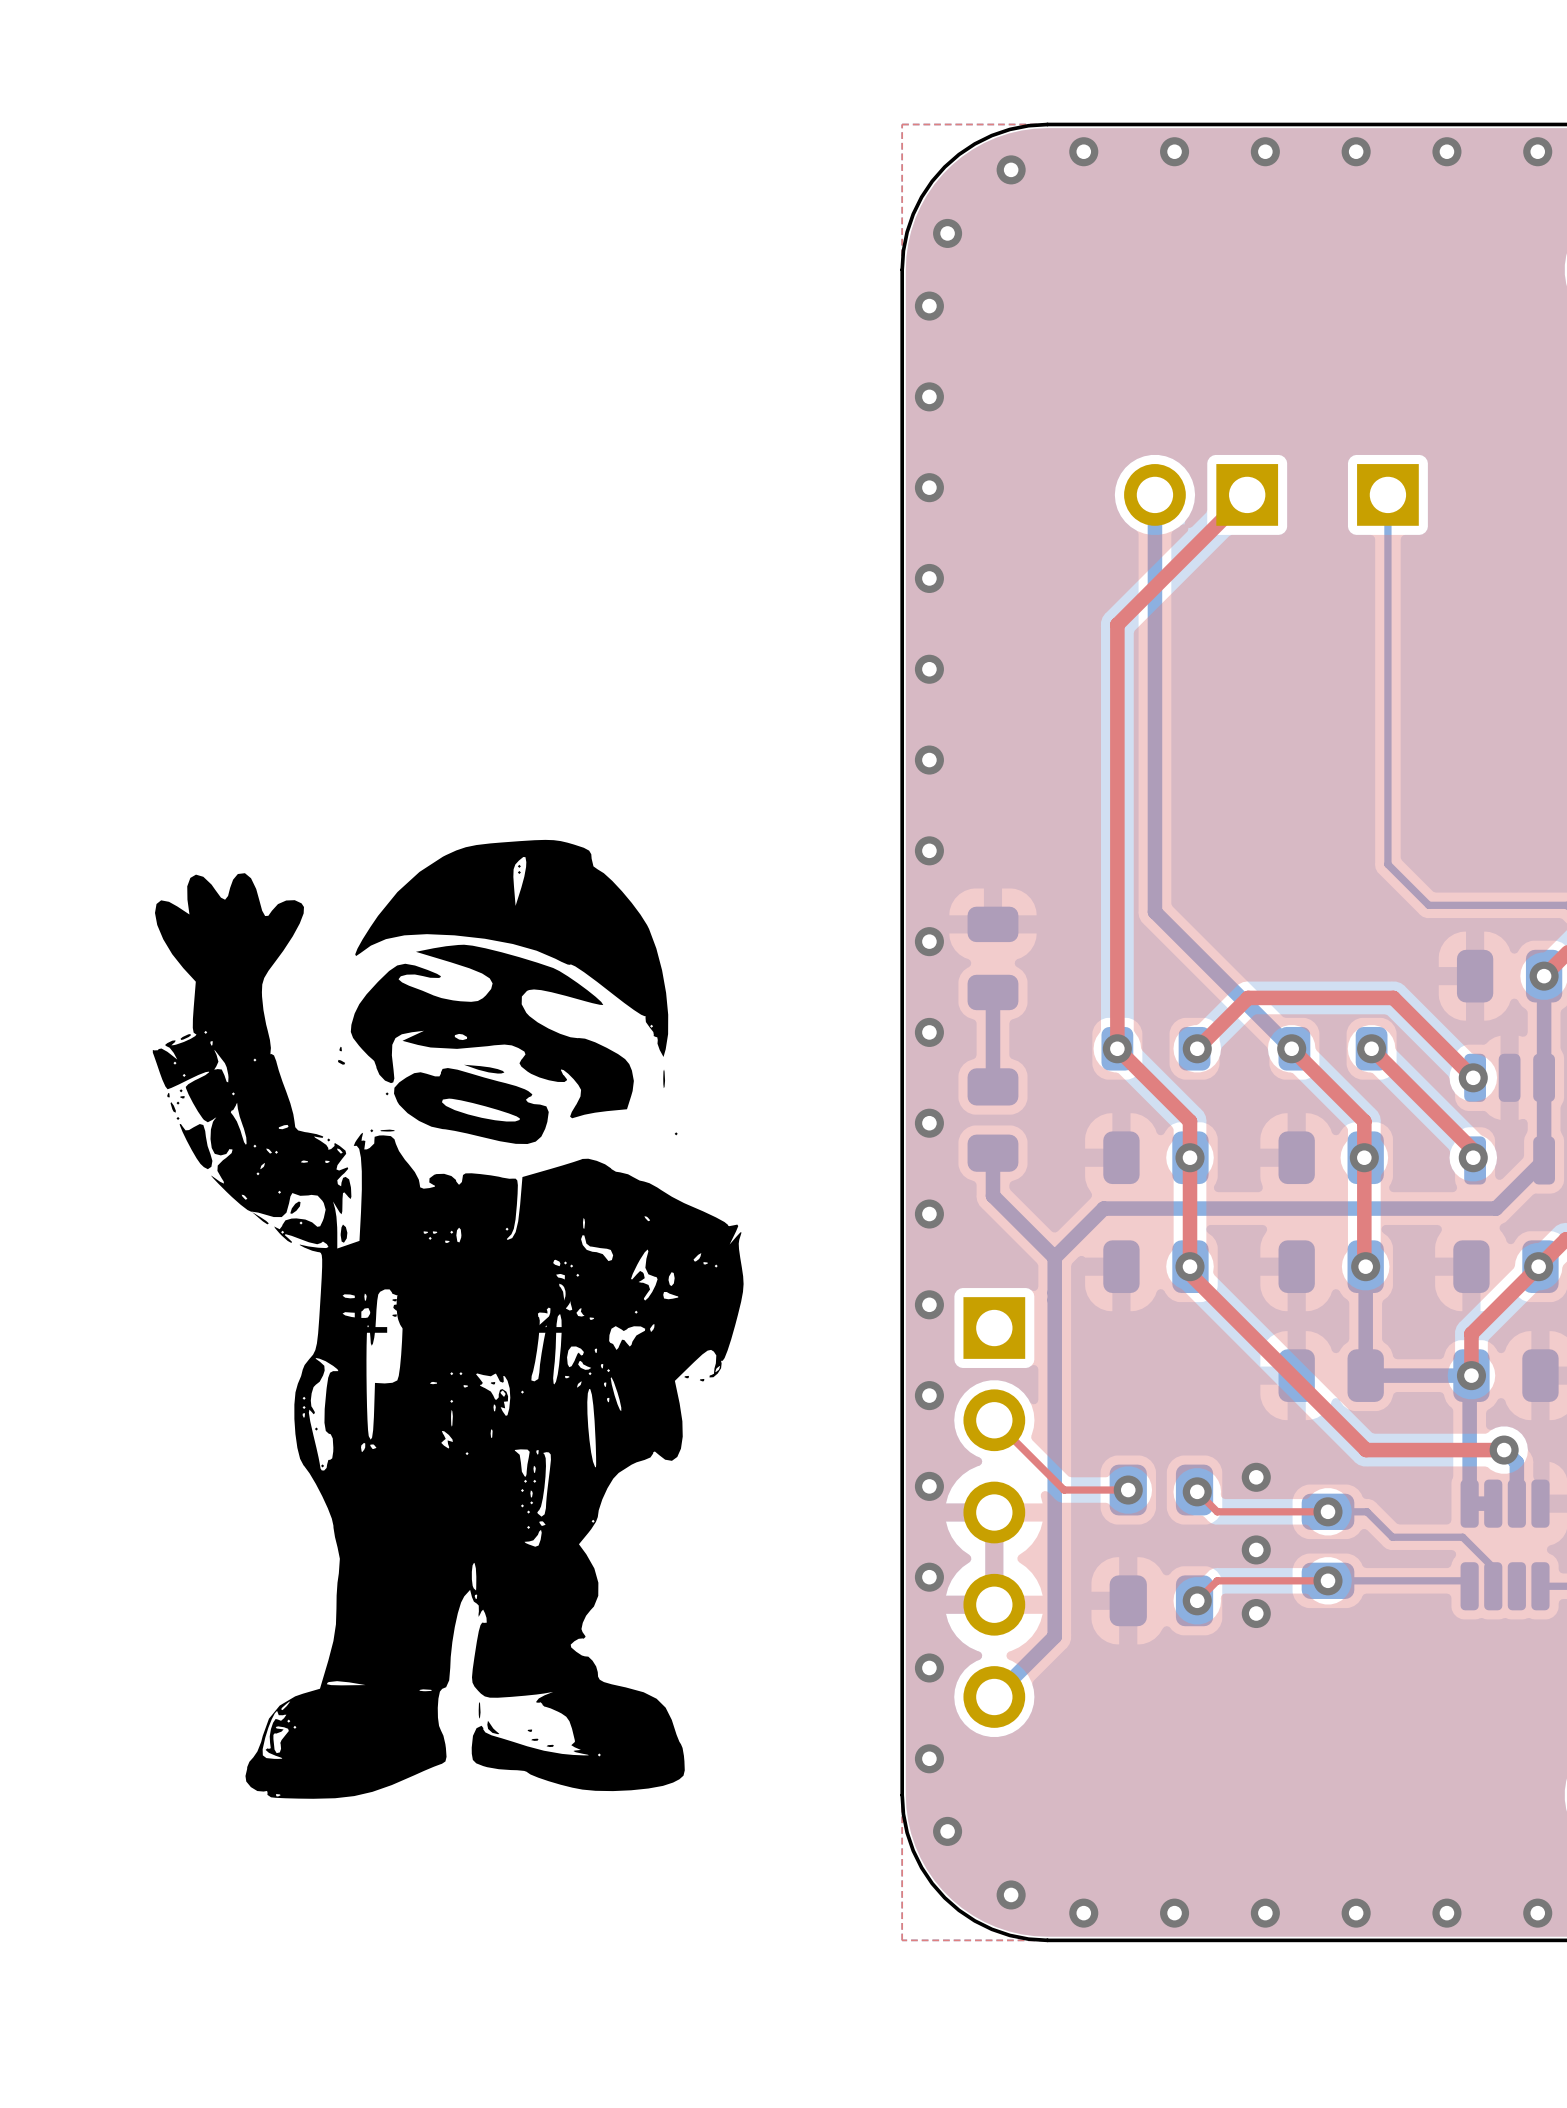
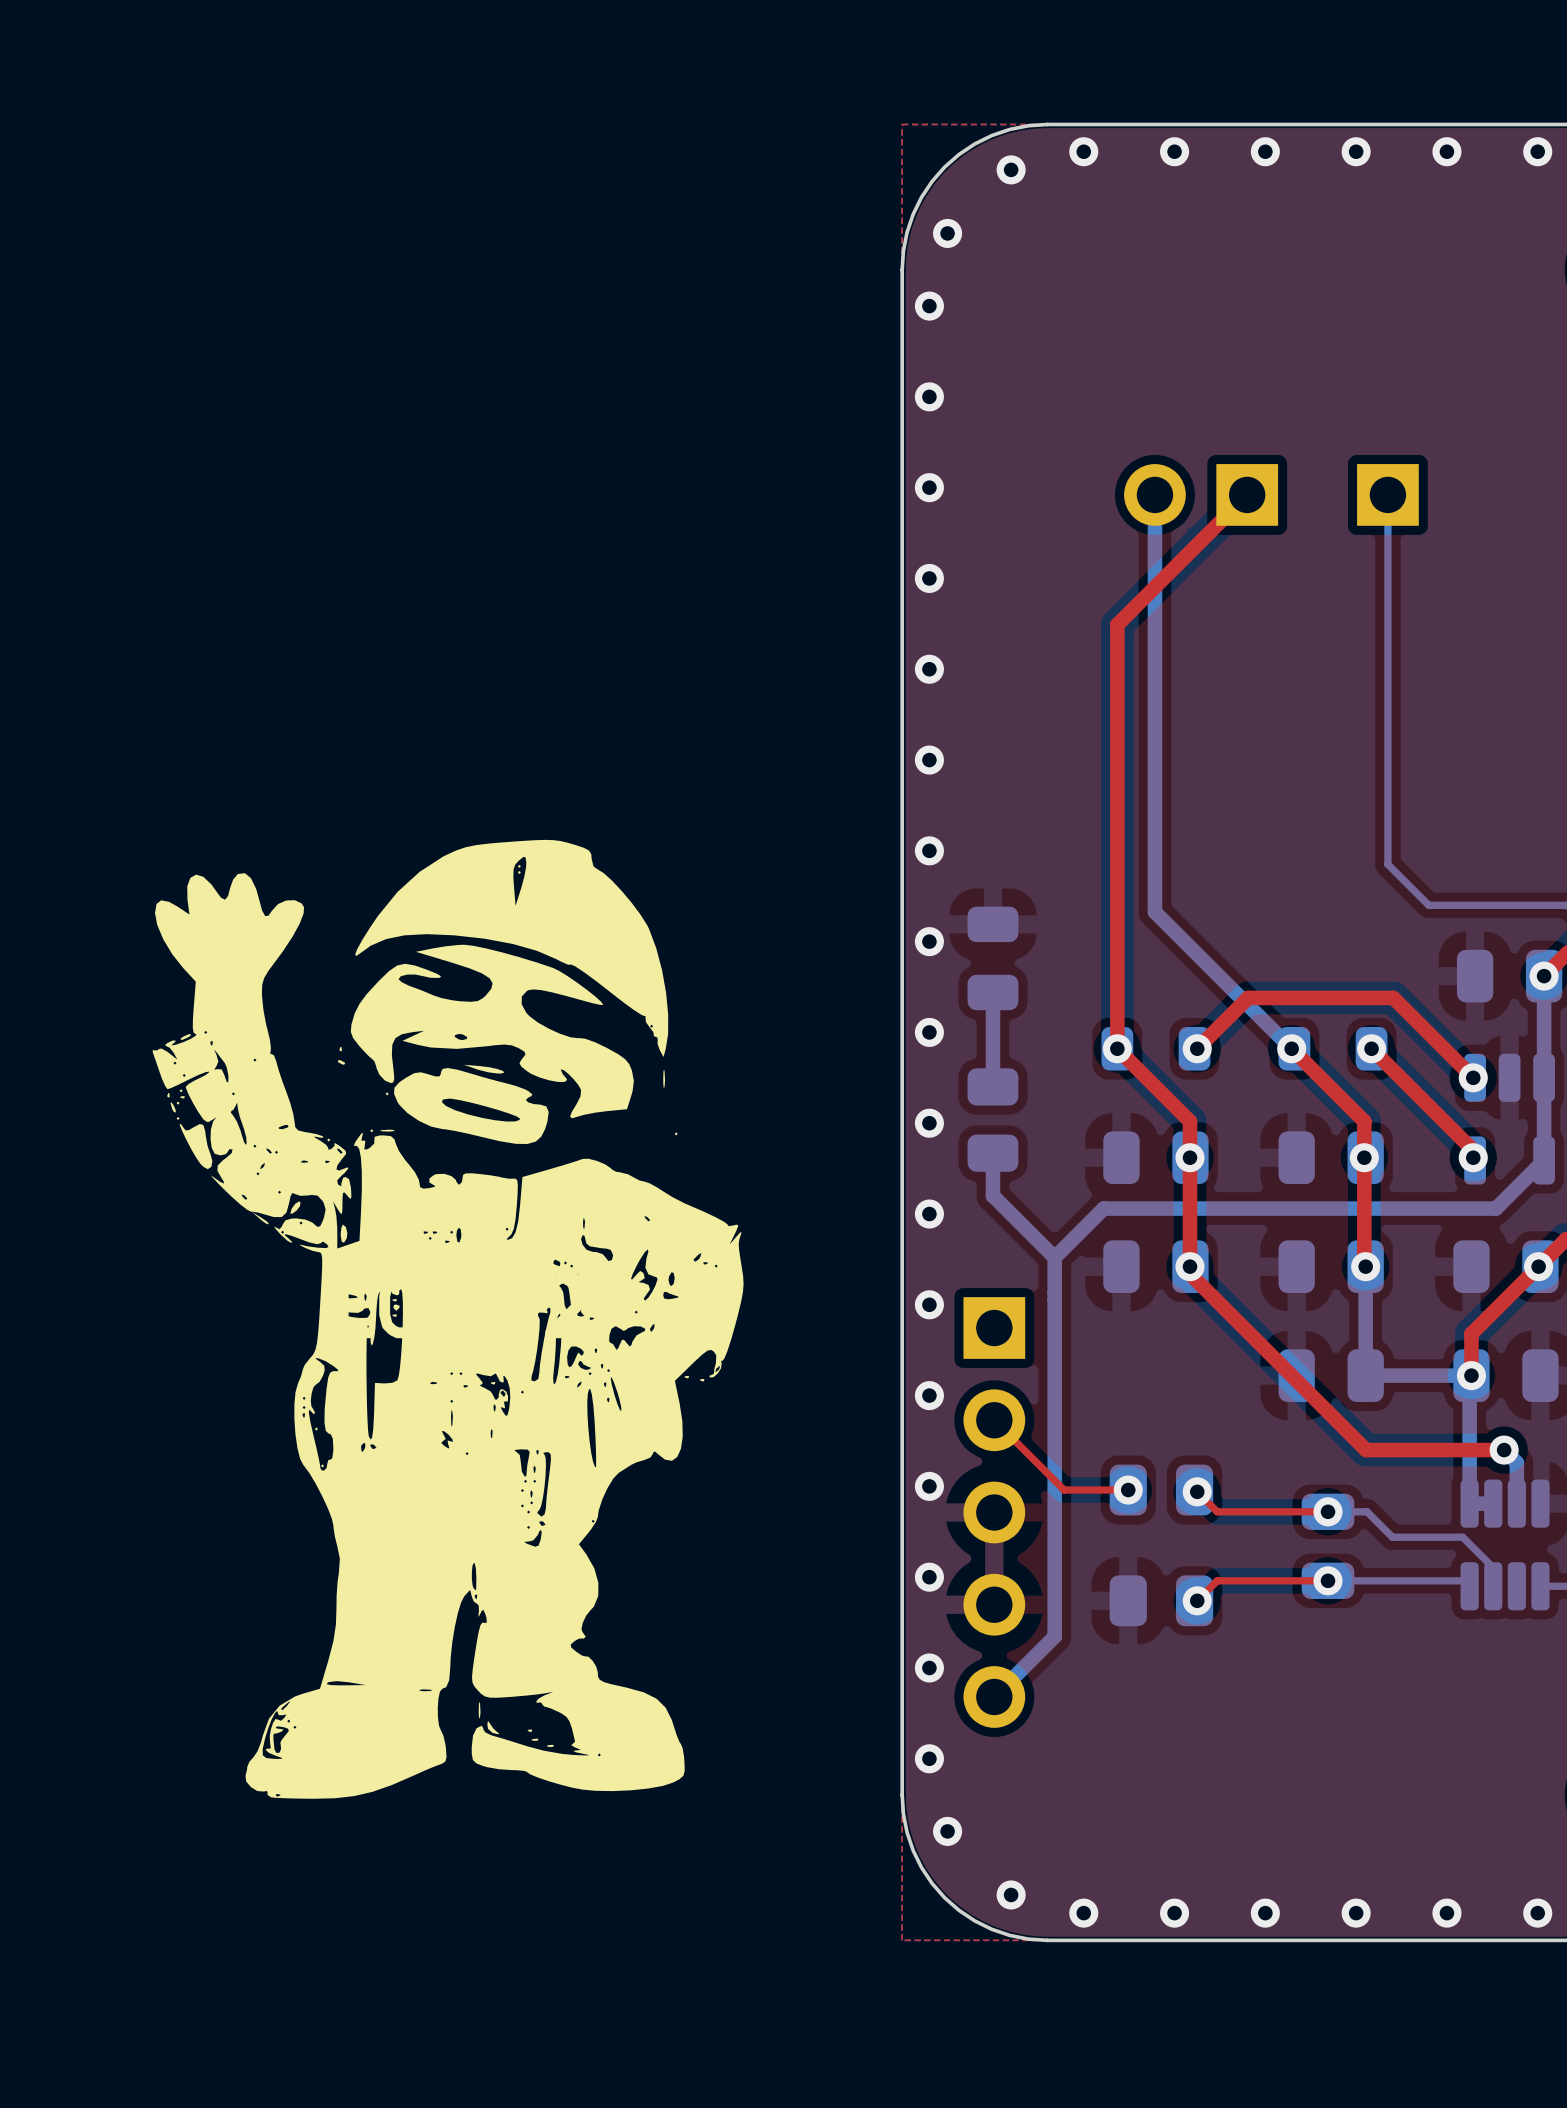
via: (1256, 1477) -> none
via: (1256, 1549) -> none
via: (1256, 1613) -> none

